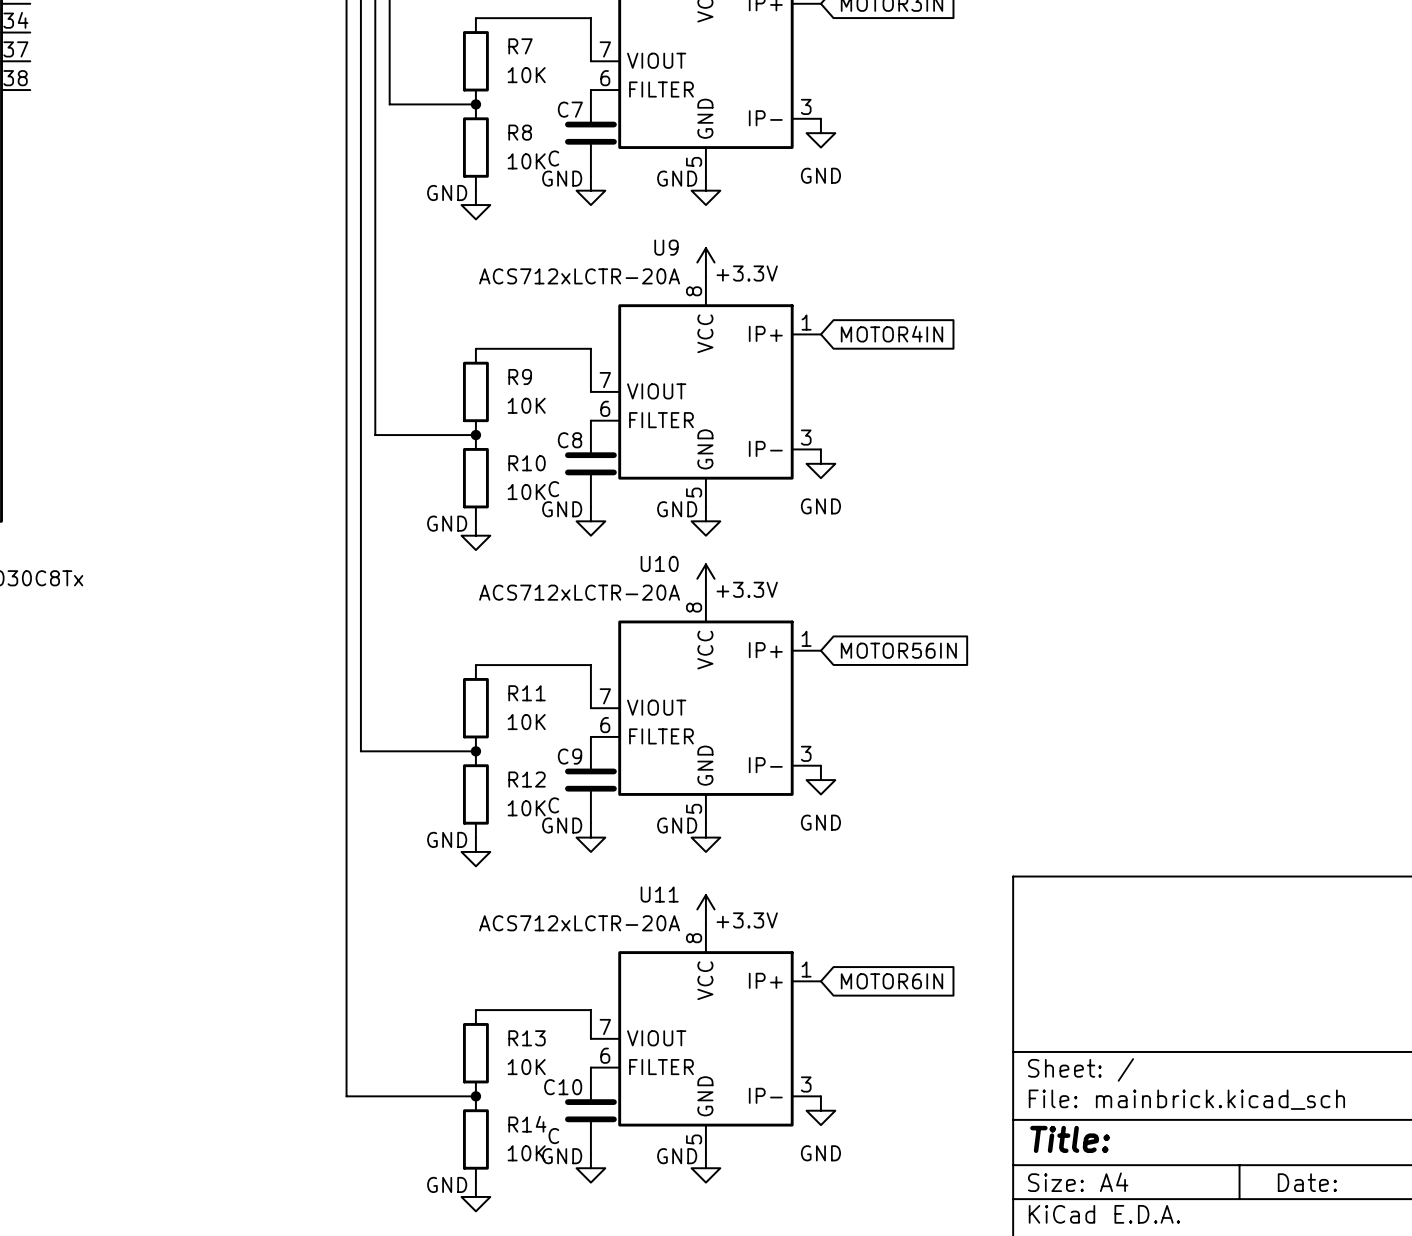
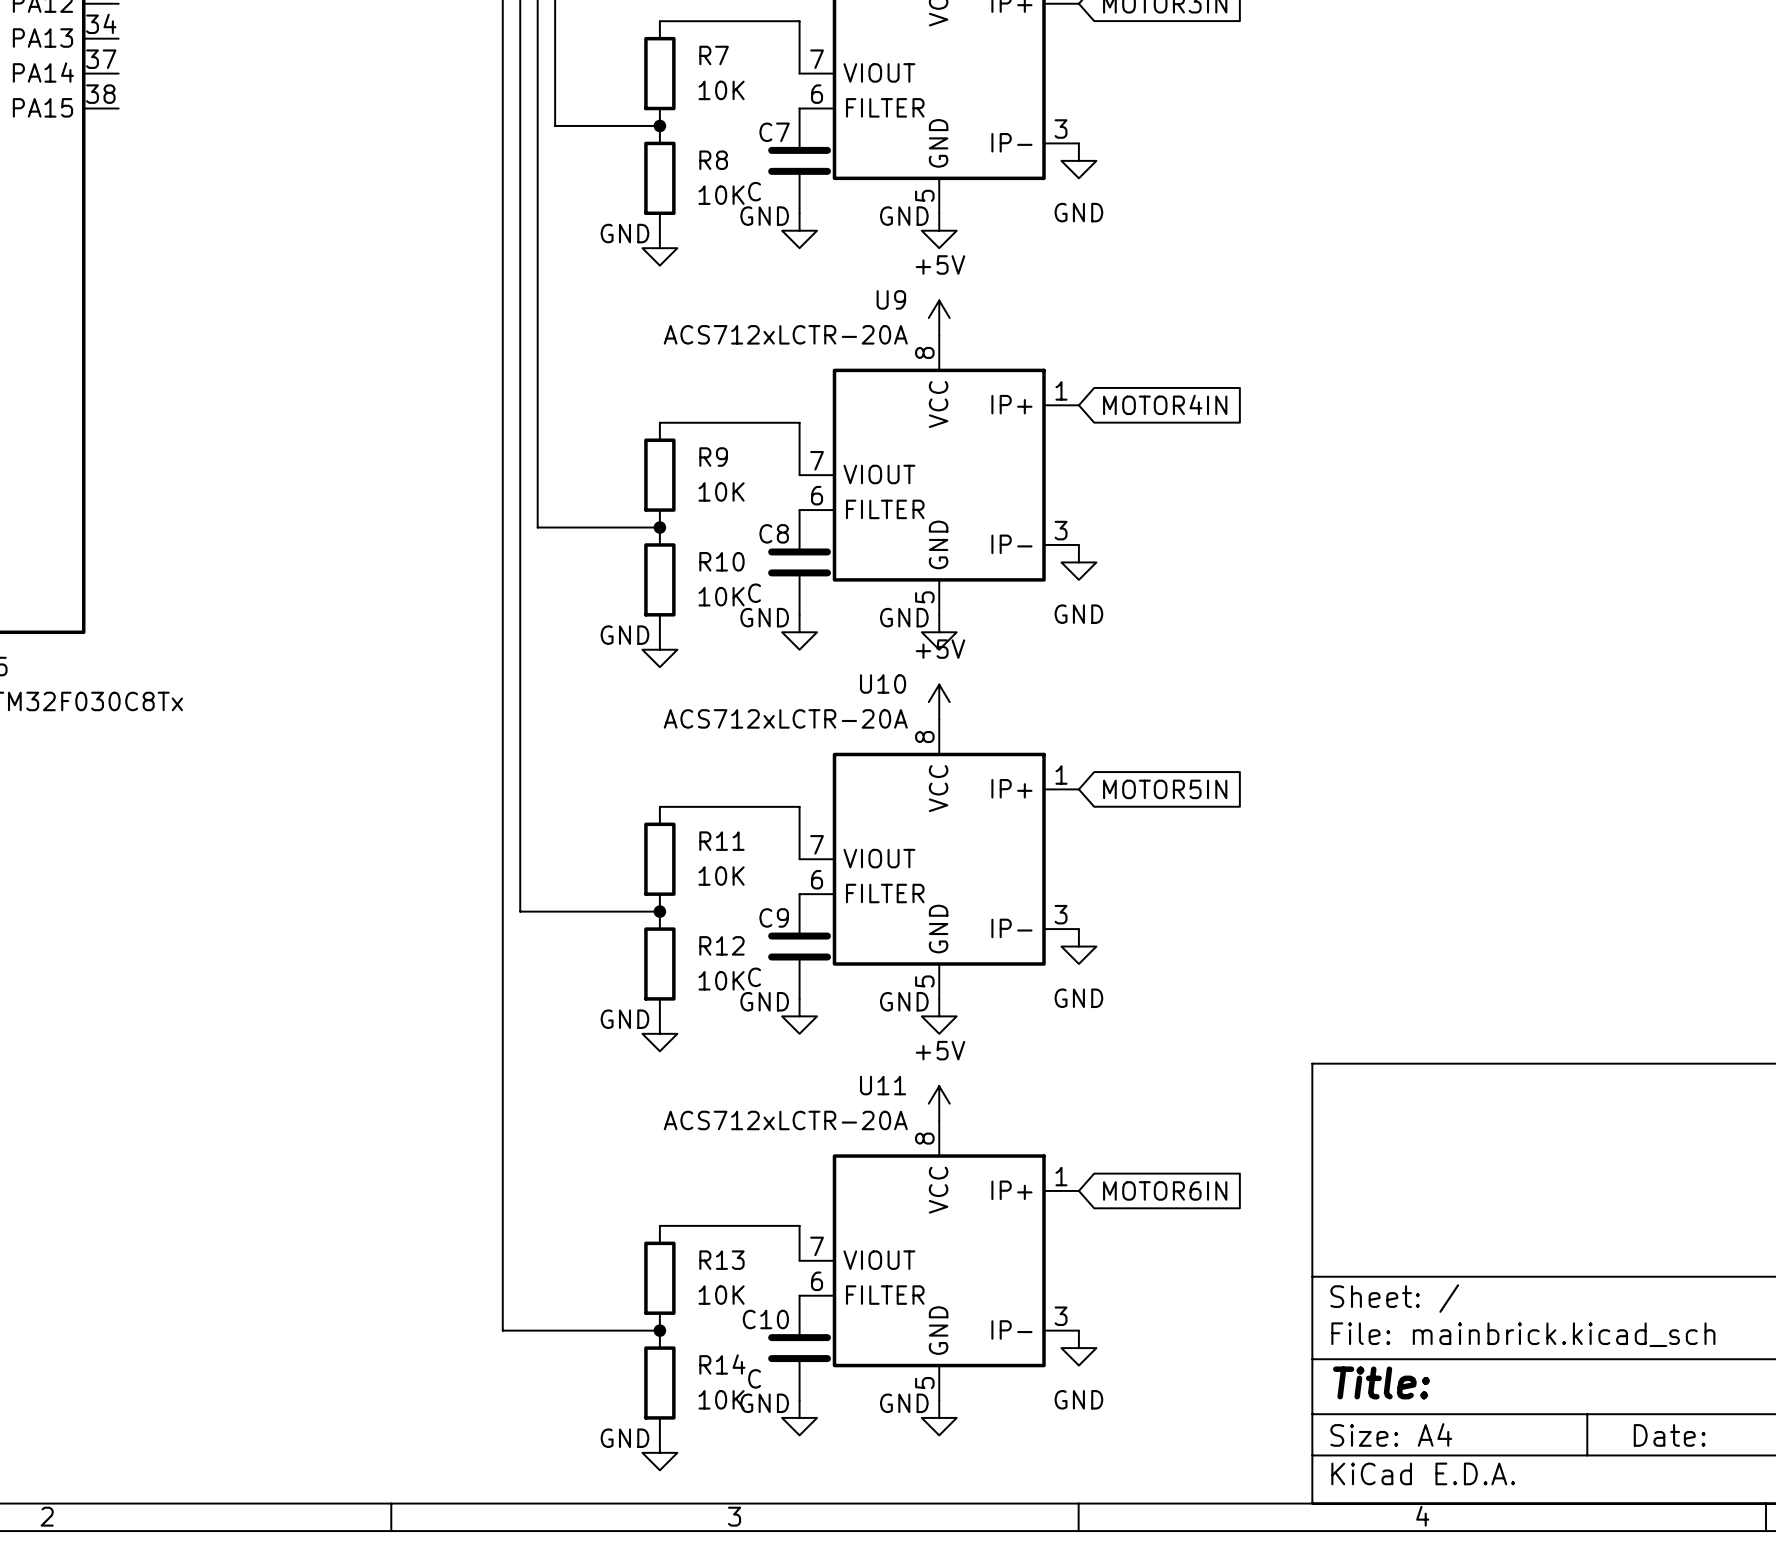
power symbol: +3.3V (705, 262) -> +5V (939, 318)
power symbol: +3.3V (705, 578) -> +5V (939, 702)
global label: MOTOR56IN (898, 650) -> MOTOR5IN (1165, 789)
power symbol: +3.3V (705, 909) -> +5V (939, 1103)

